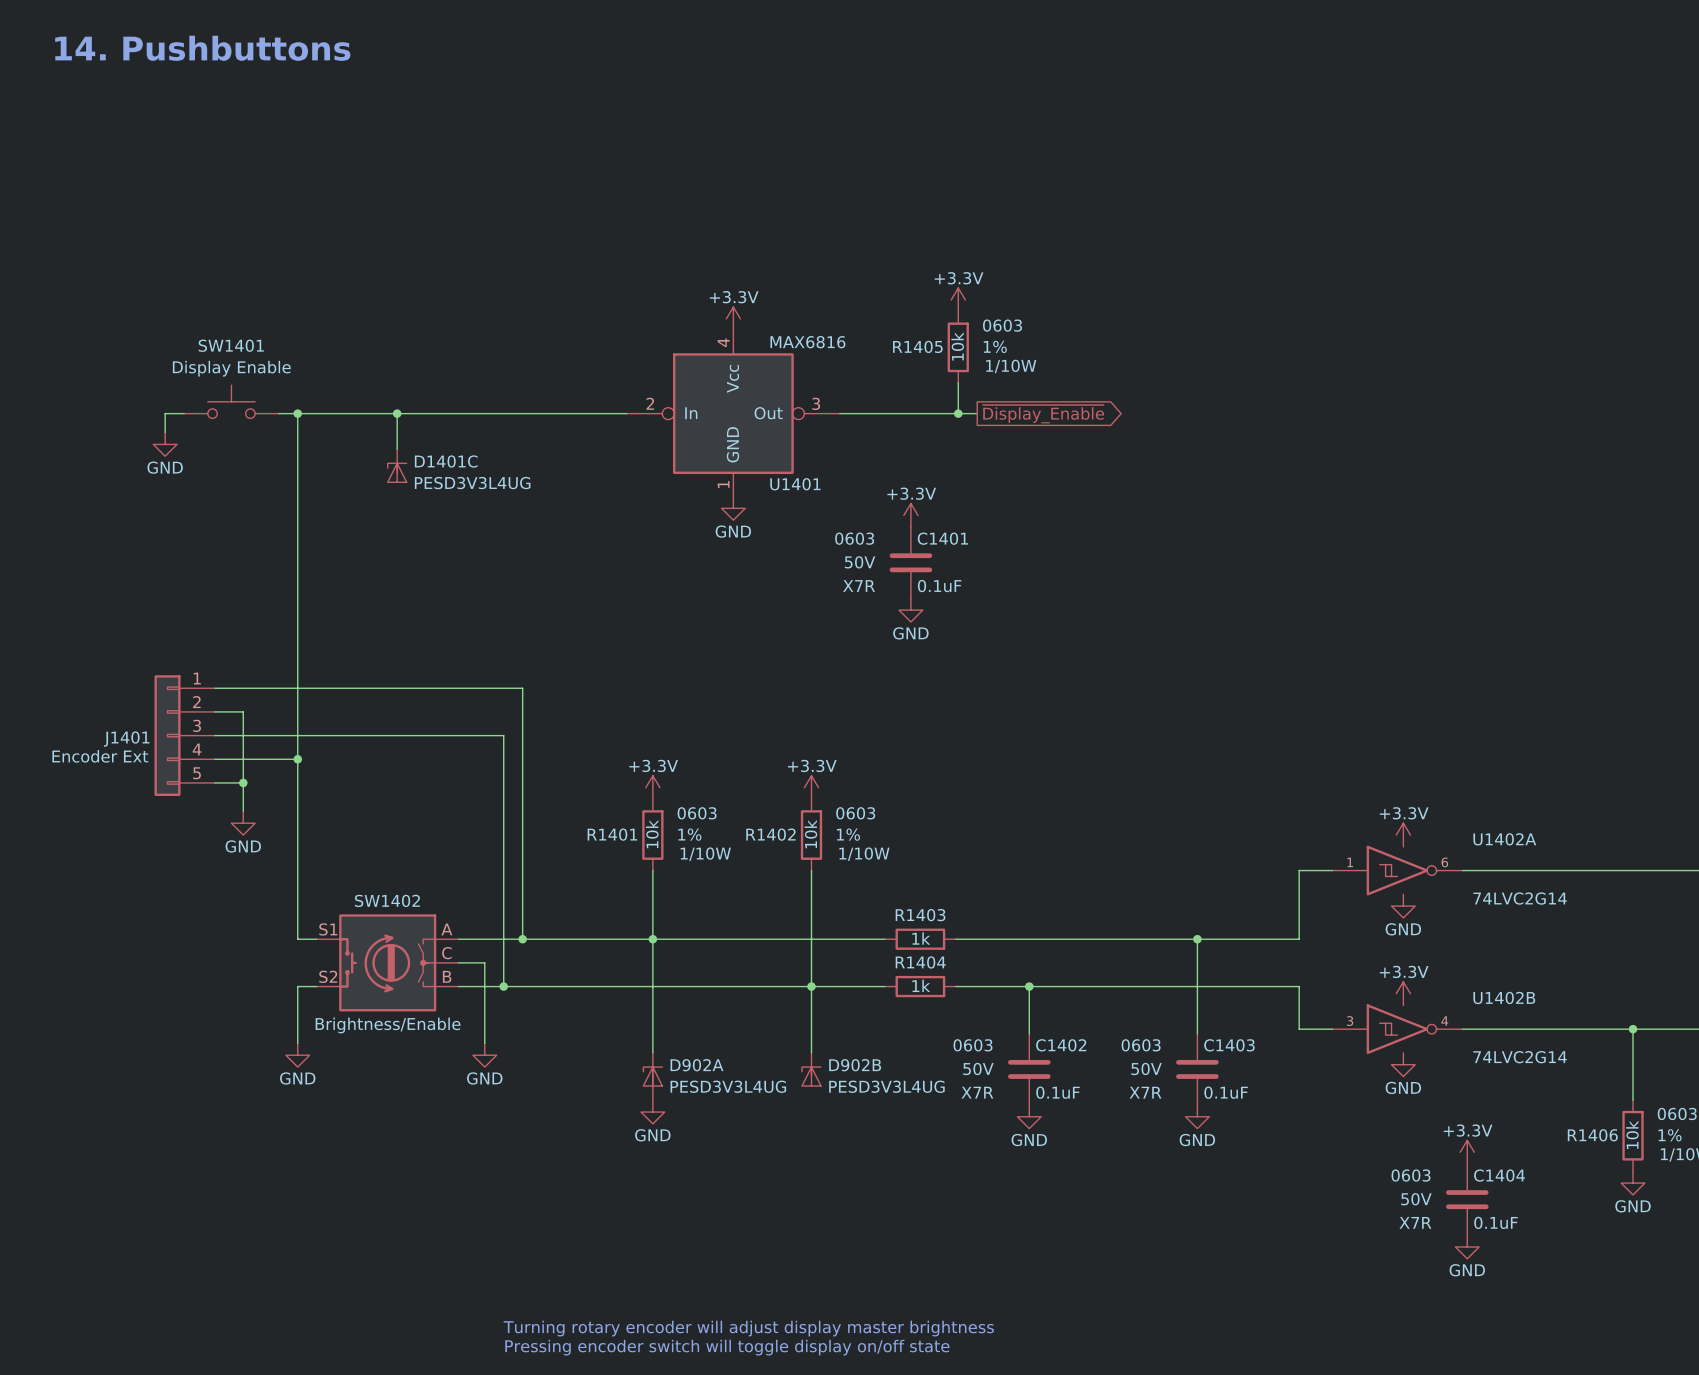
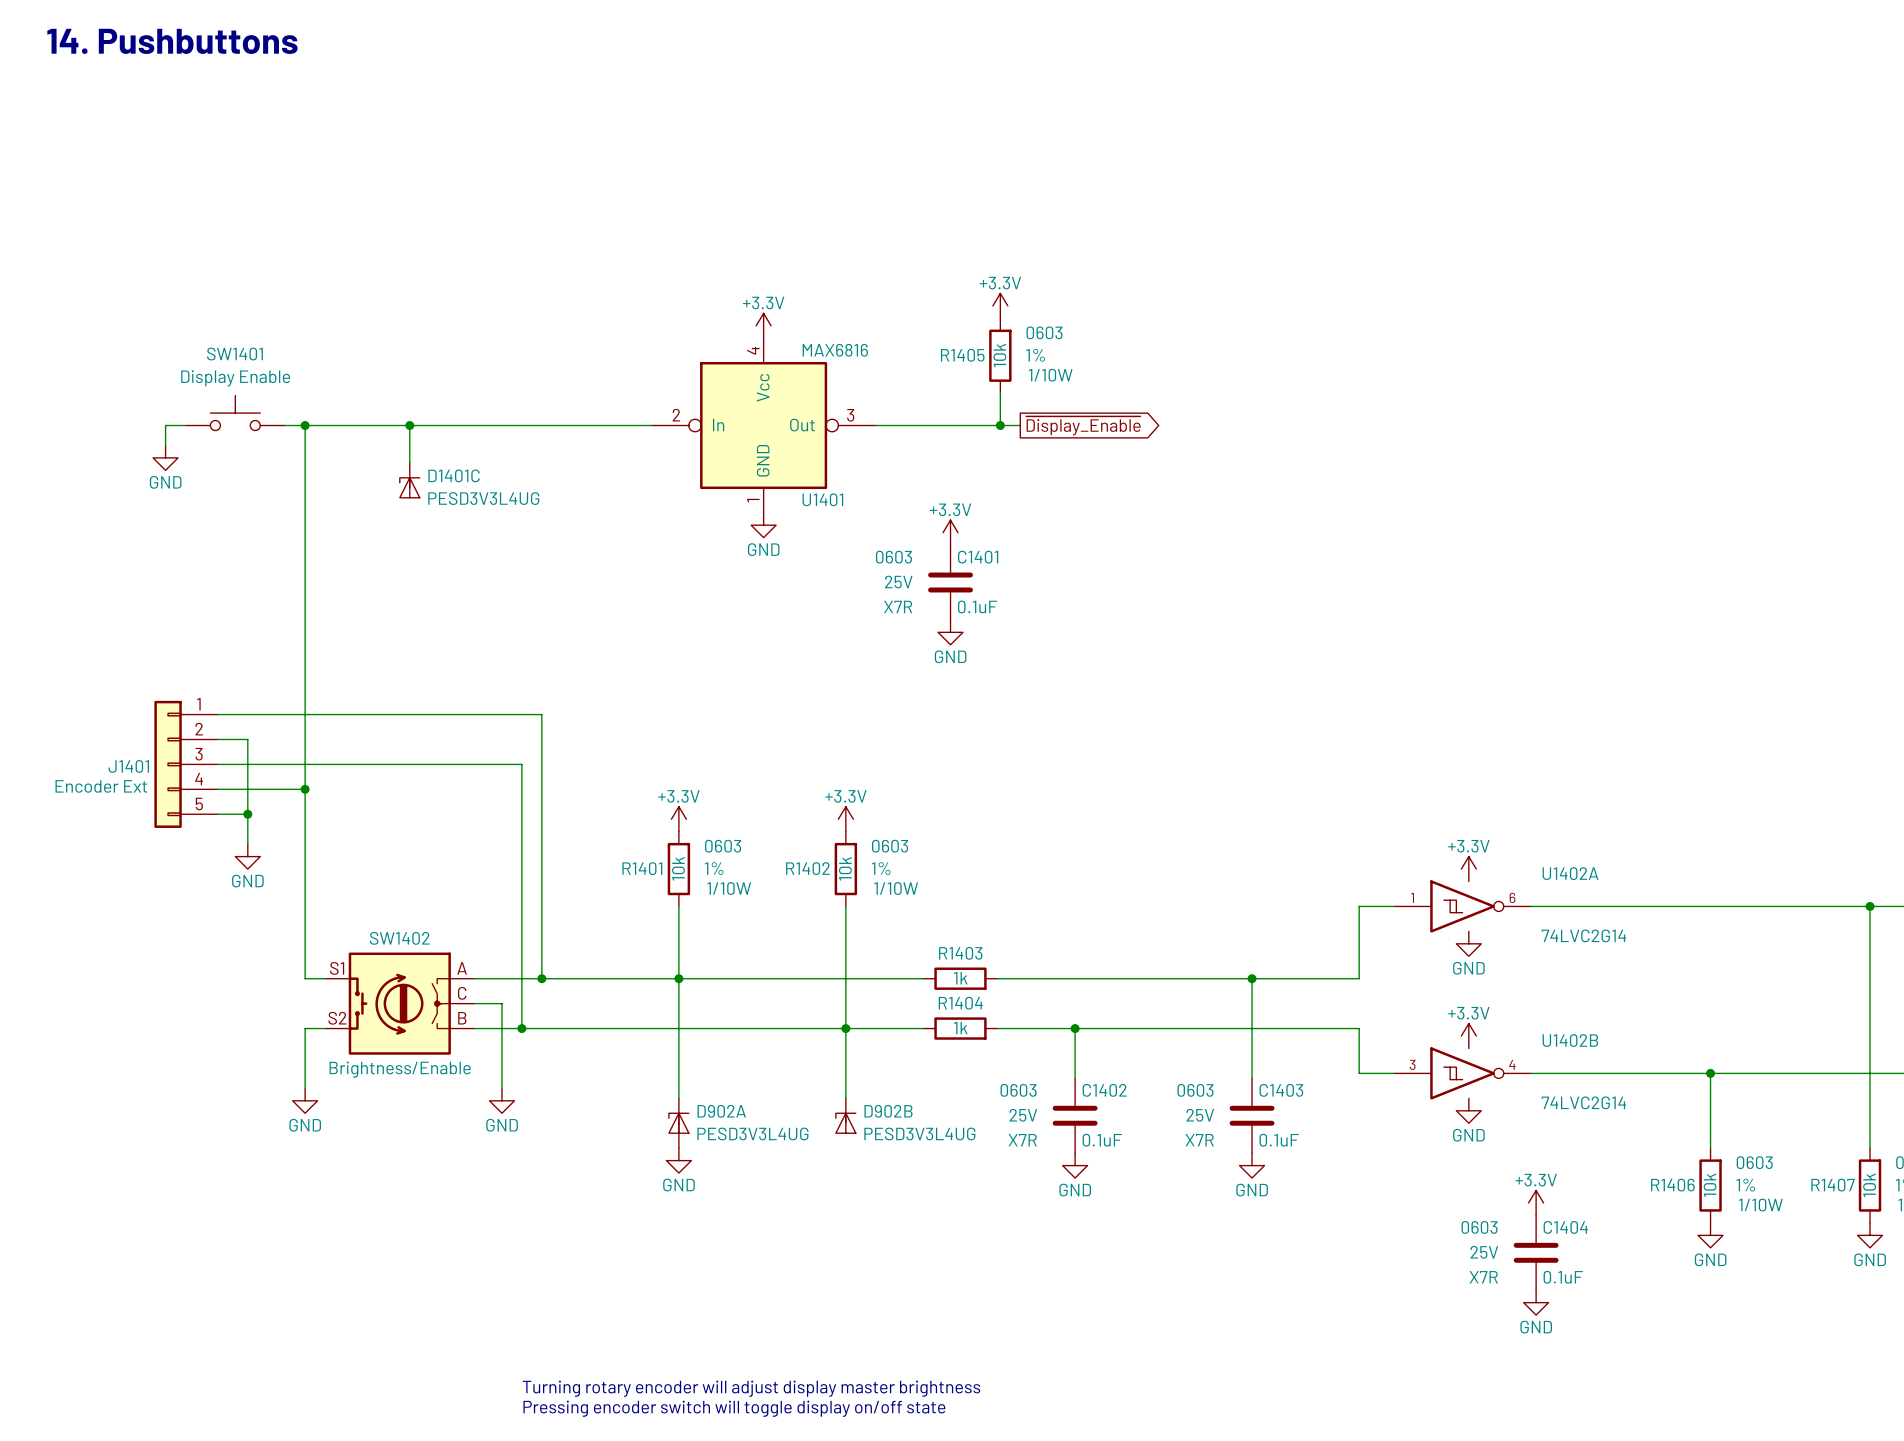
C1401 text: 50V (860, 562) -> 25V (898, 582)
C1402 text: 50V (978, 1069) -> 25V (1023, 1115)
C1403 text: 50V (1146, 1069) -> 25V (1200, 1115)
C1404 text: 50V (1416, 1199) -> 25V (1484, 1252)

